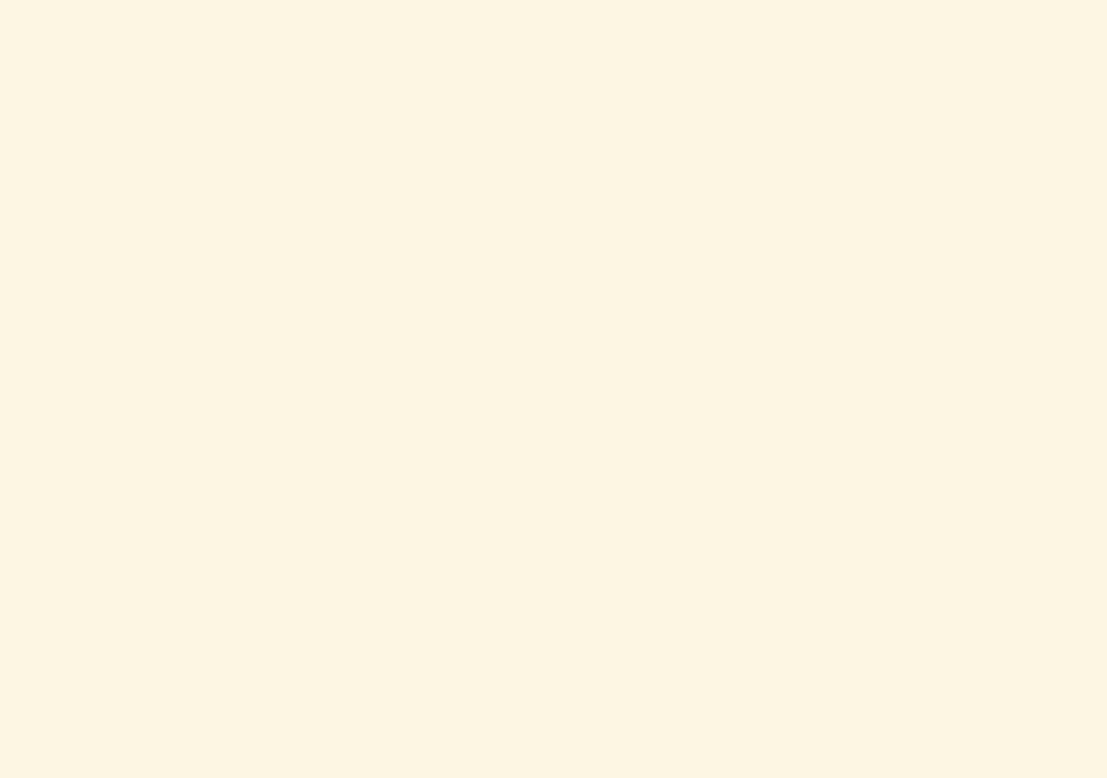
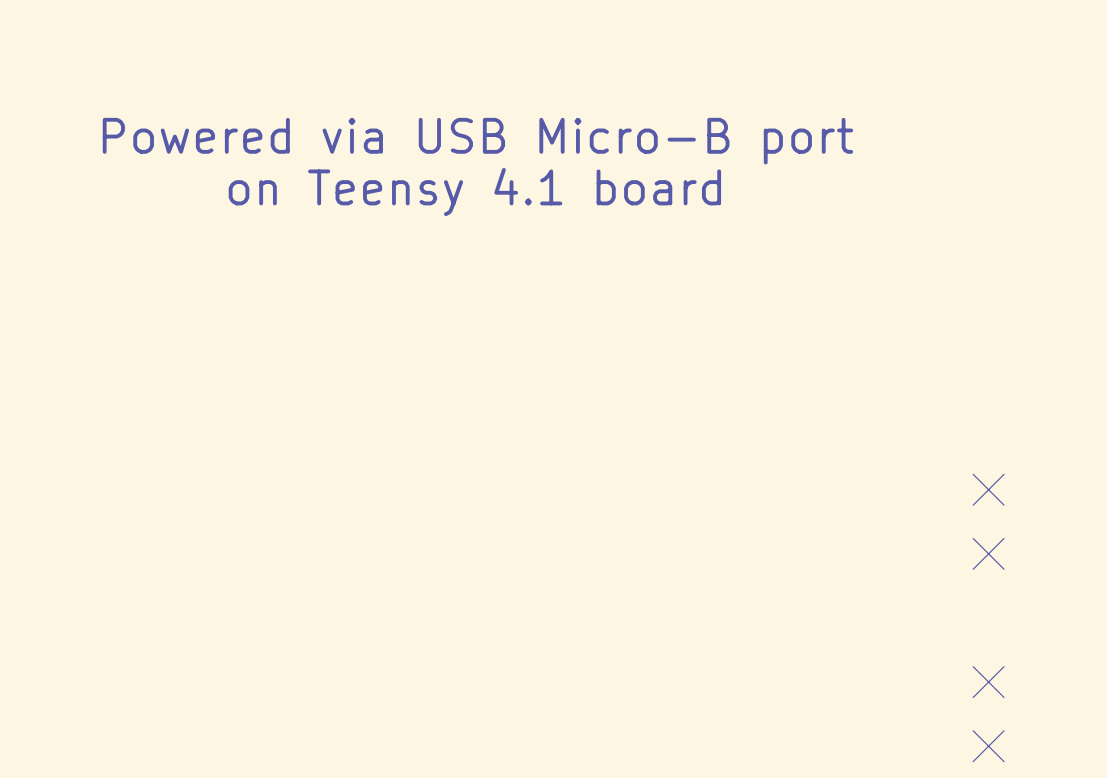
text: none -> Powered via USB Micro-B port (477, 141)
text: none -> on Teensy 4.1 board (474, 192)
no-connect mark: none -> (988, 489)
no-connect mark: none -> (988, 553)
no-connect mark: none -> (988, 682)
no-connect mark: none -> (988, 746)

